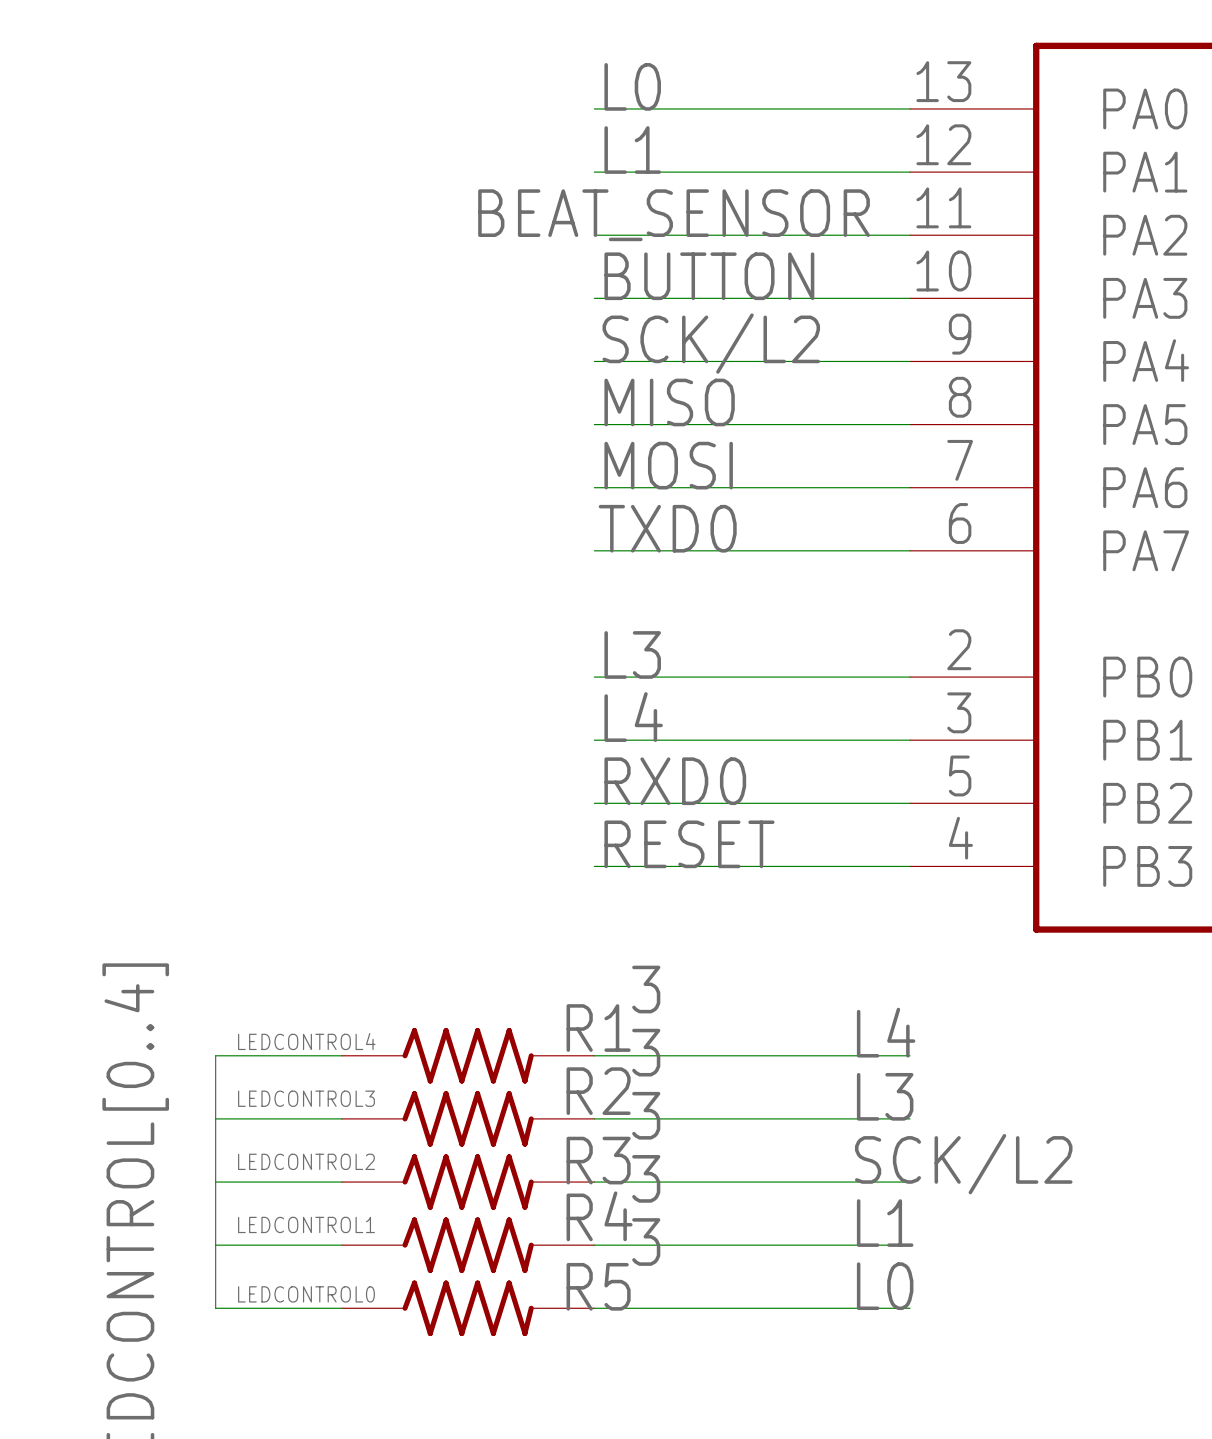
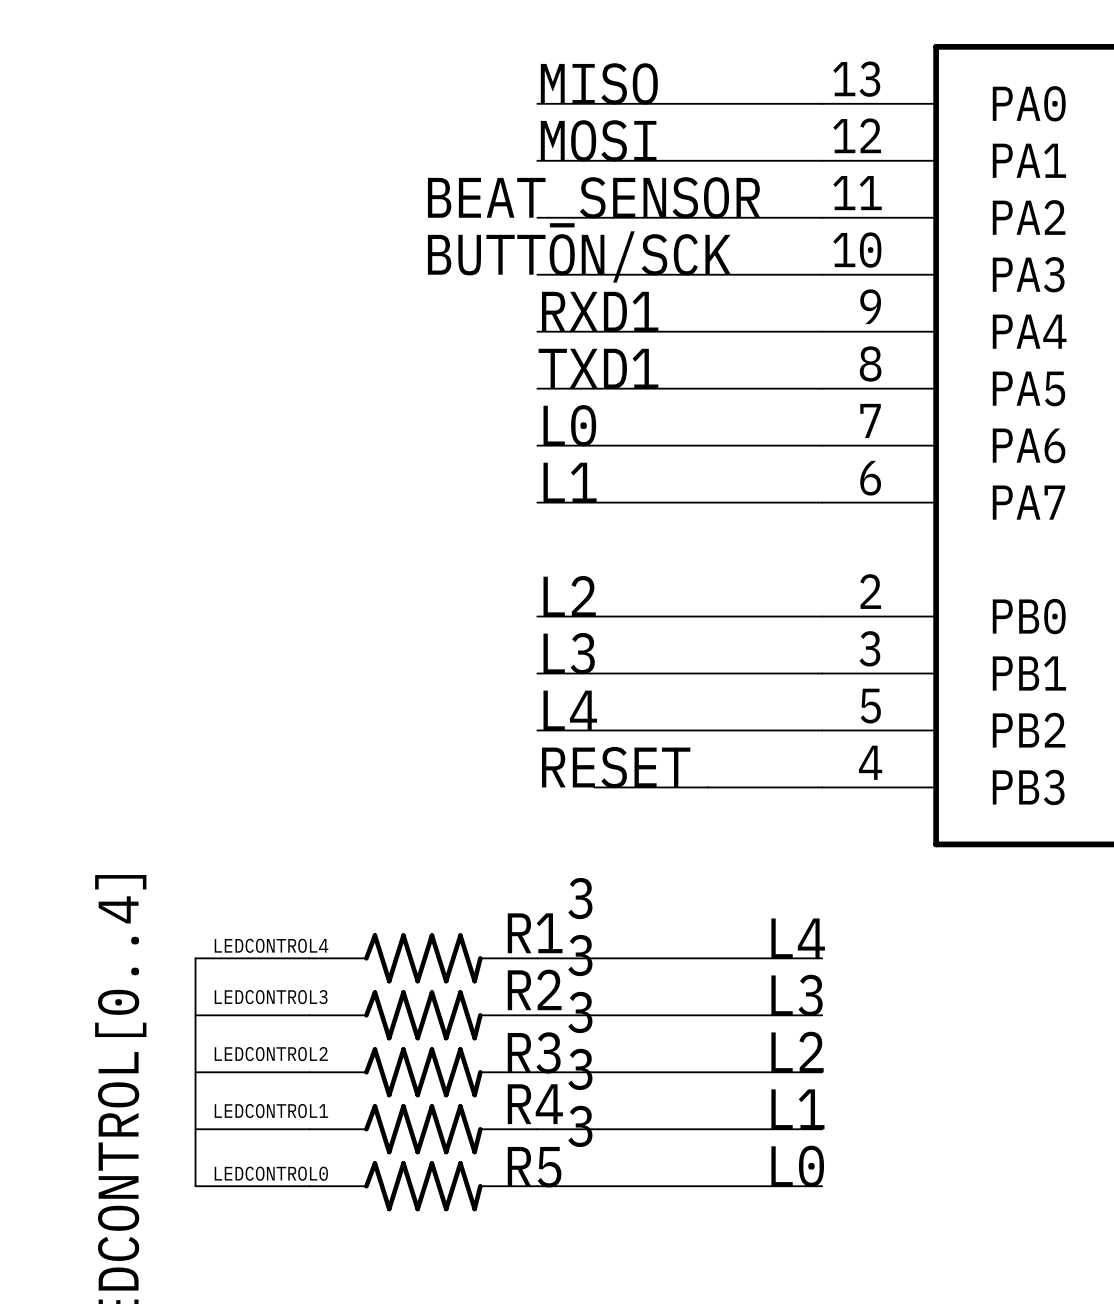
label: L0 (632, 86) -> MISO (599, 83)
label: L1 (632, 150) -> MOSI (598, 140)
label: BUTTON (709, 276) -> BUTTON/SCK (579, 256)
label: SCK/L2 (711, 343) -> RXD1 (600, 311)
label: MISO (669, 402) -> TXD1 (598, 368)
label: MOSI (668, 465) -> L0 (569, 425)
label: TXD0 (667, 528) -> L1 (570, 482)
label: L3 (632, 654) -> L2 (569, 596)
label: L4 (633, 717) -> L3 (569, 653)
label: RXD0 (675, 781) -> L4 (570, 710)
wire: (594, 866) (657, 866) -> none
label: SCK/L2 (963, 1164) -> L2 (797, 1052)

